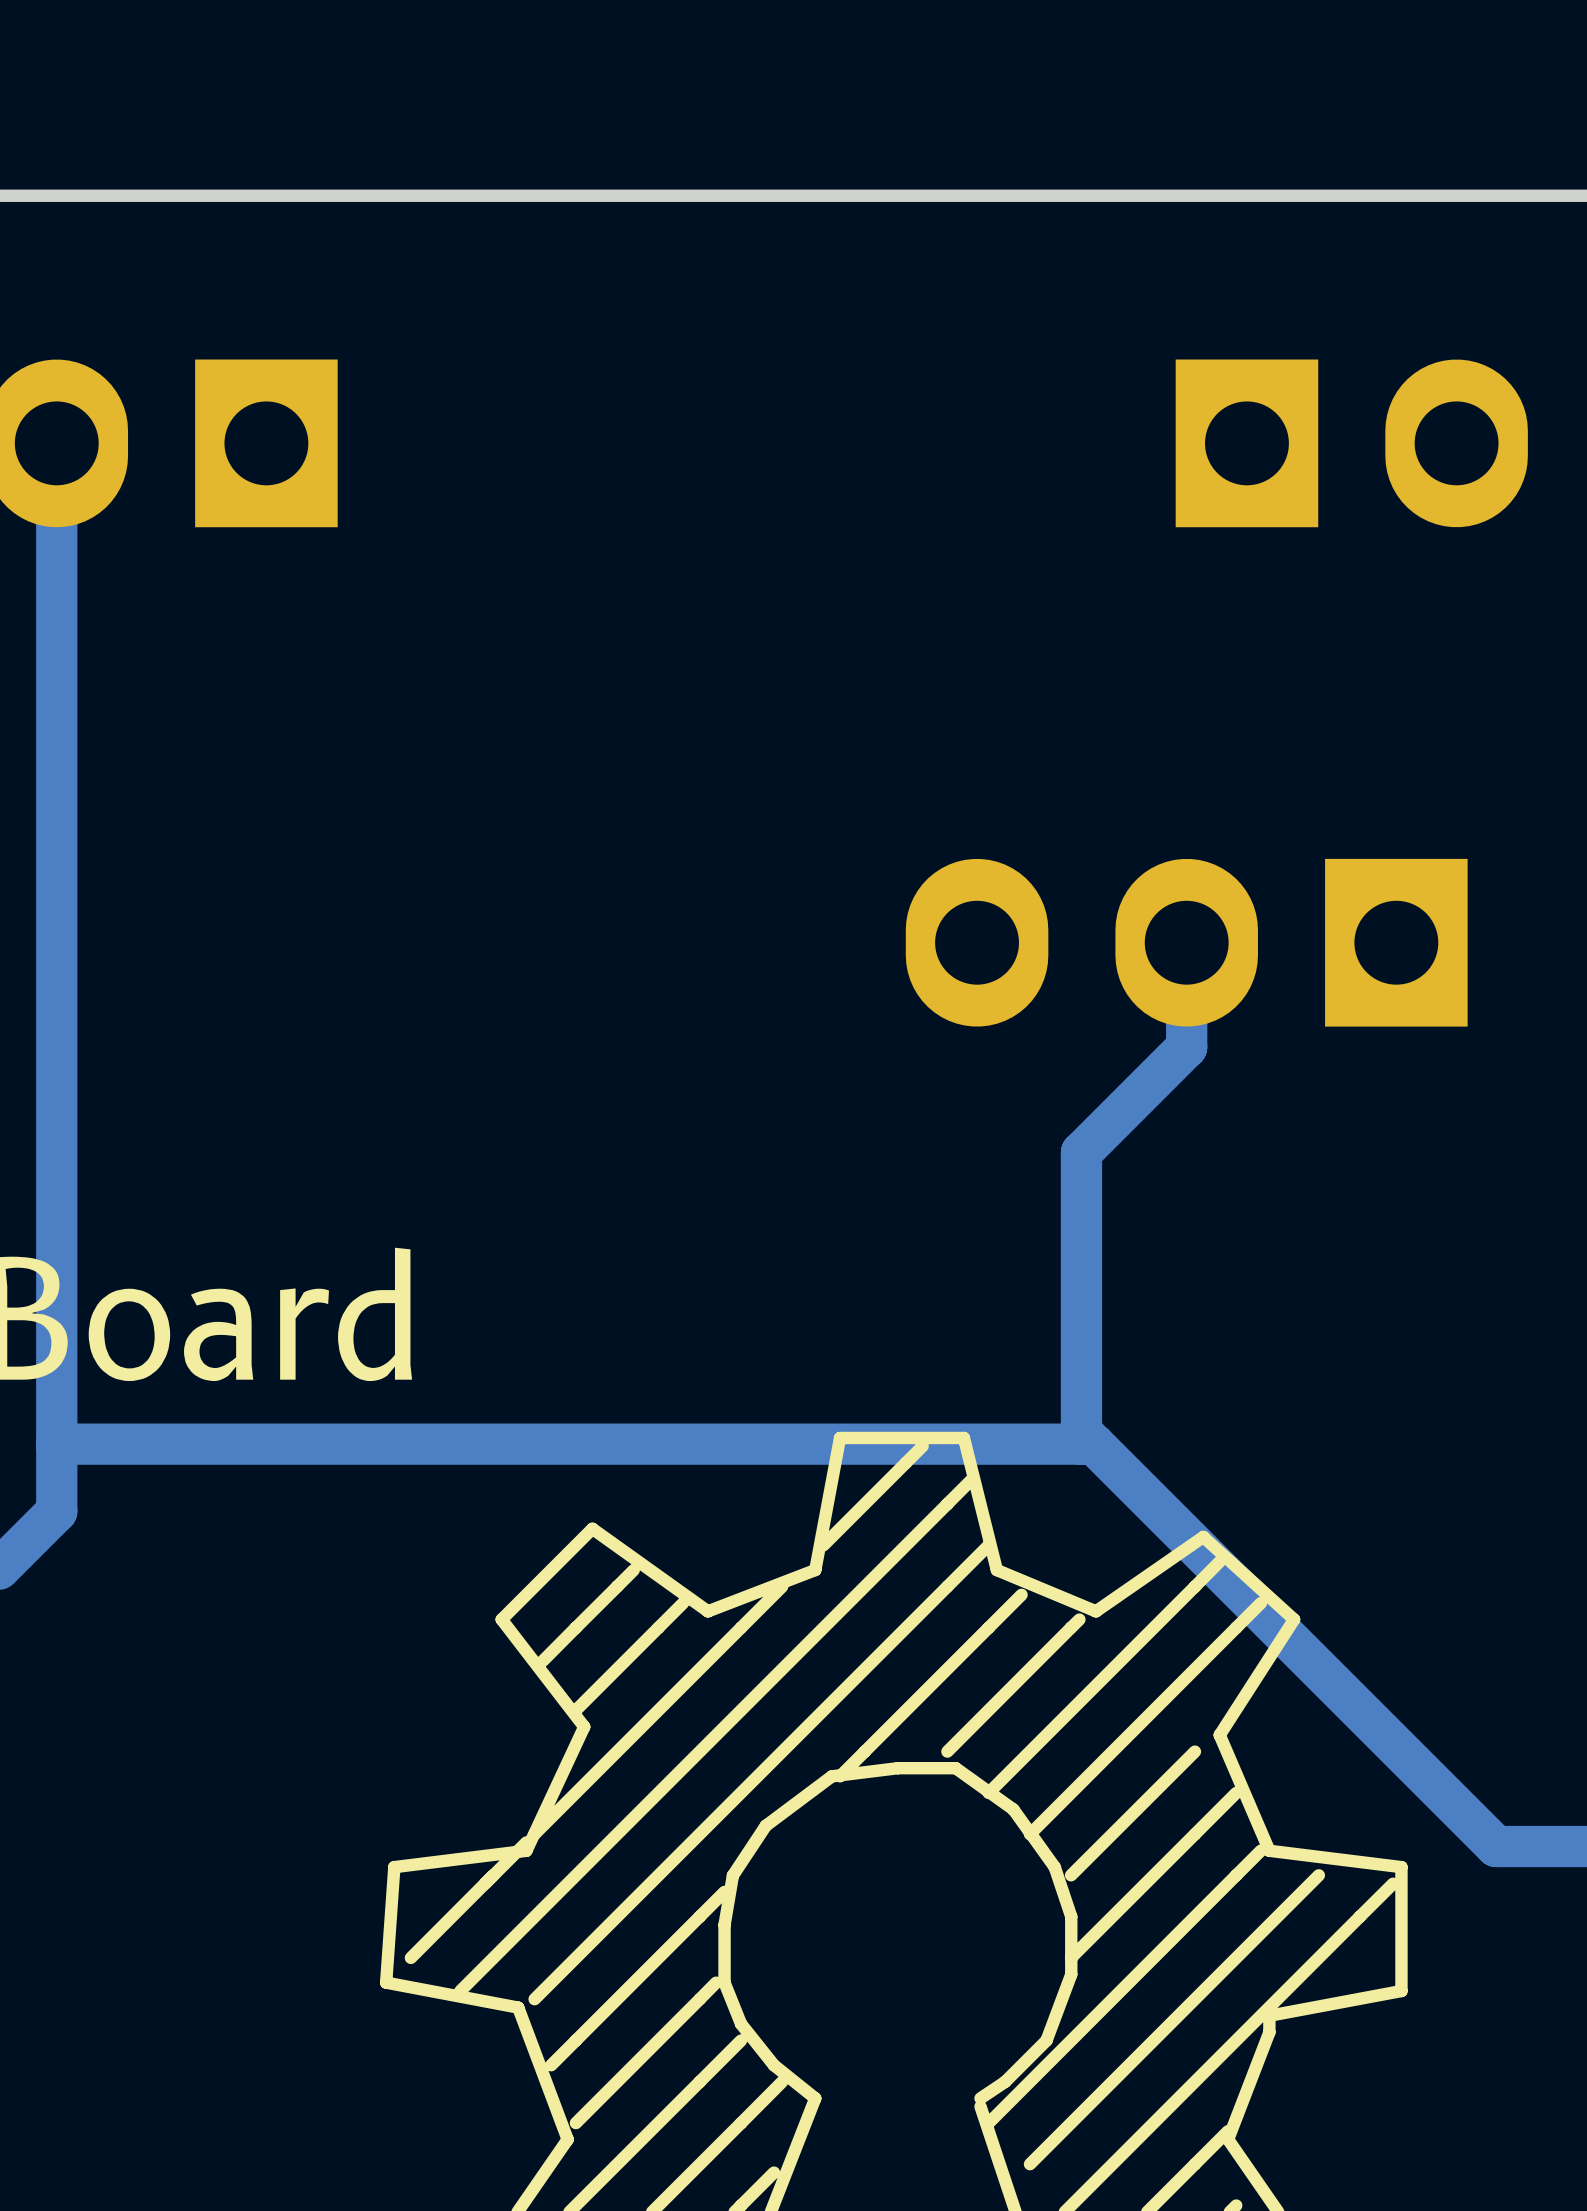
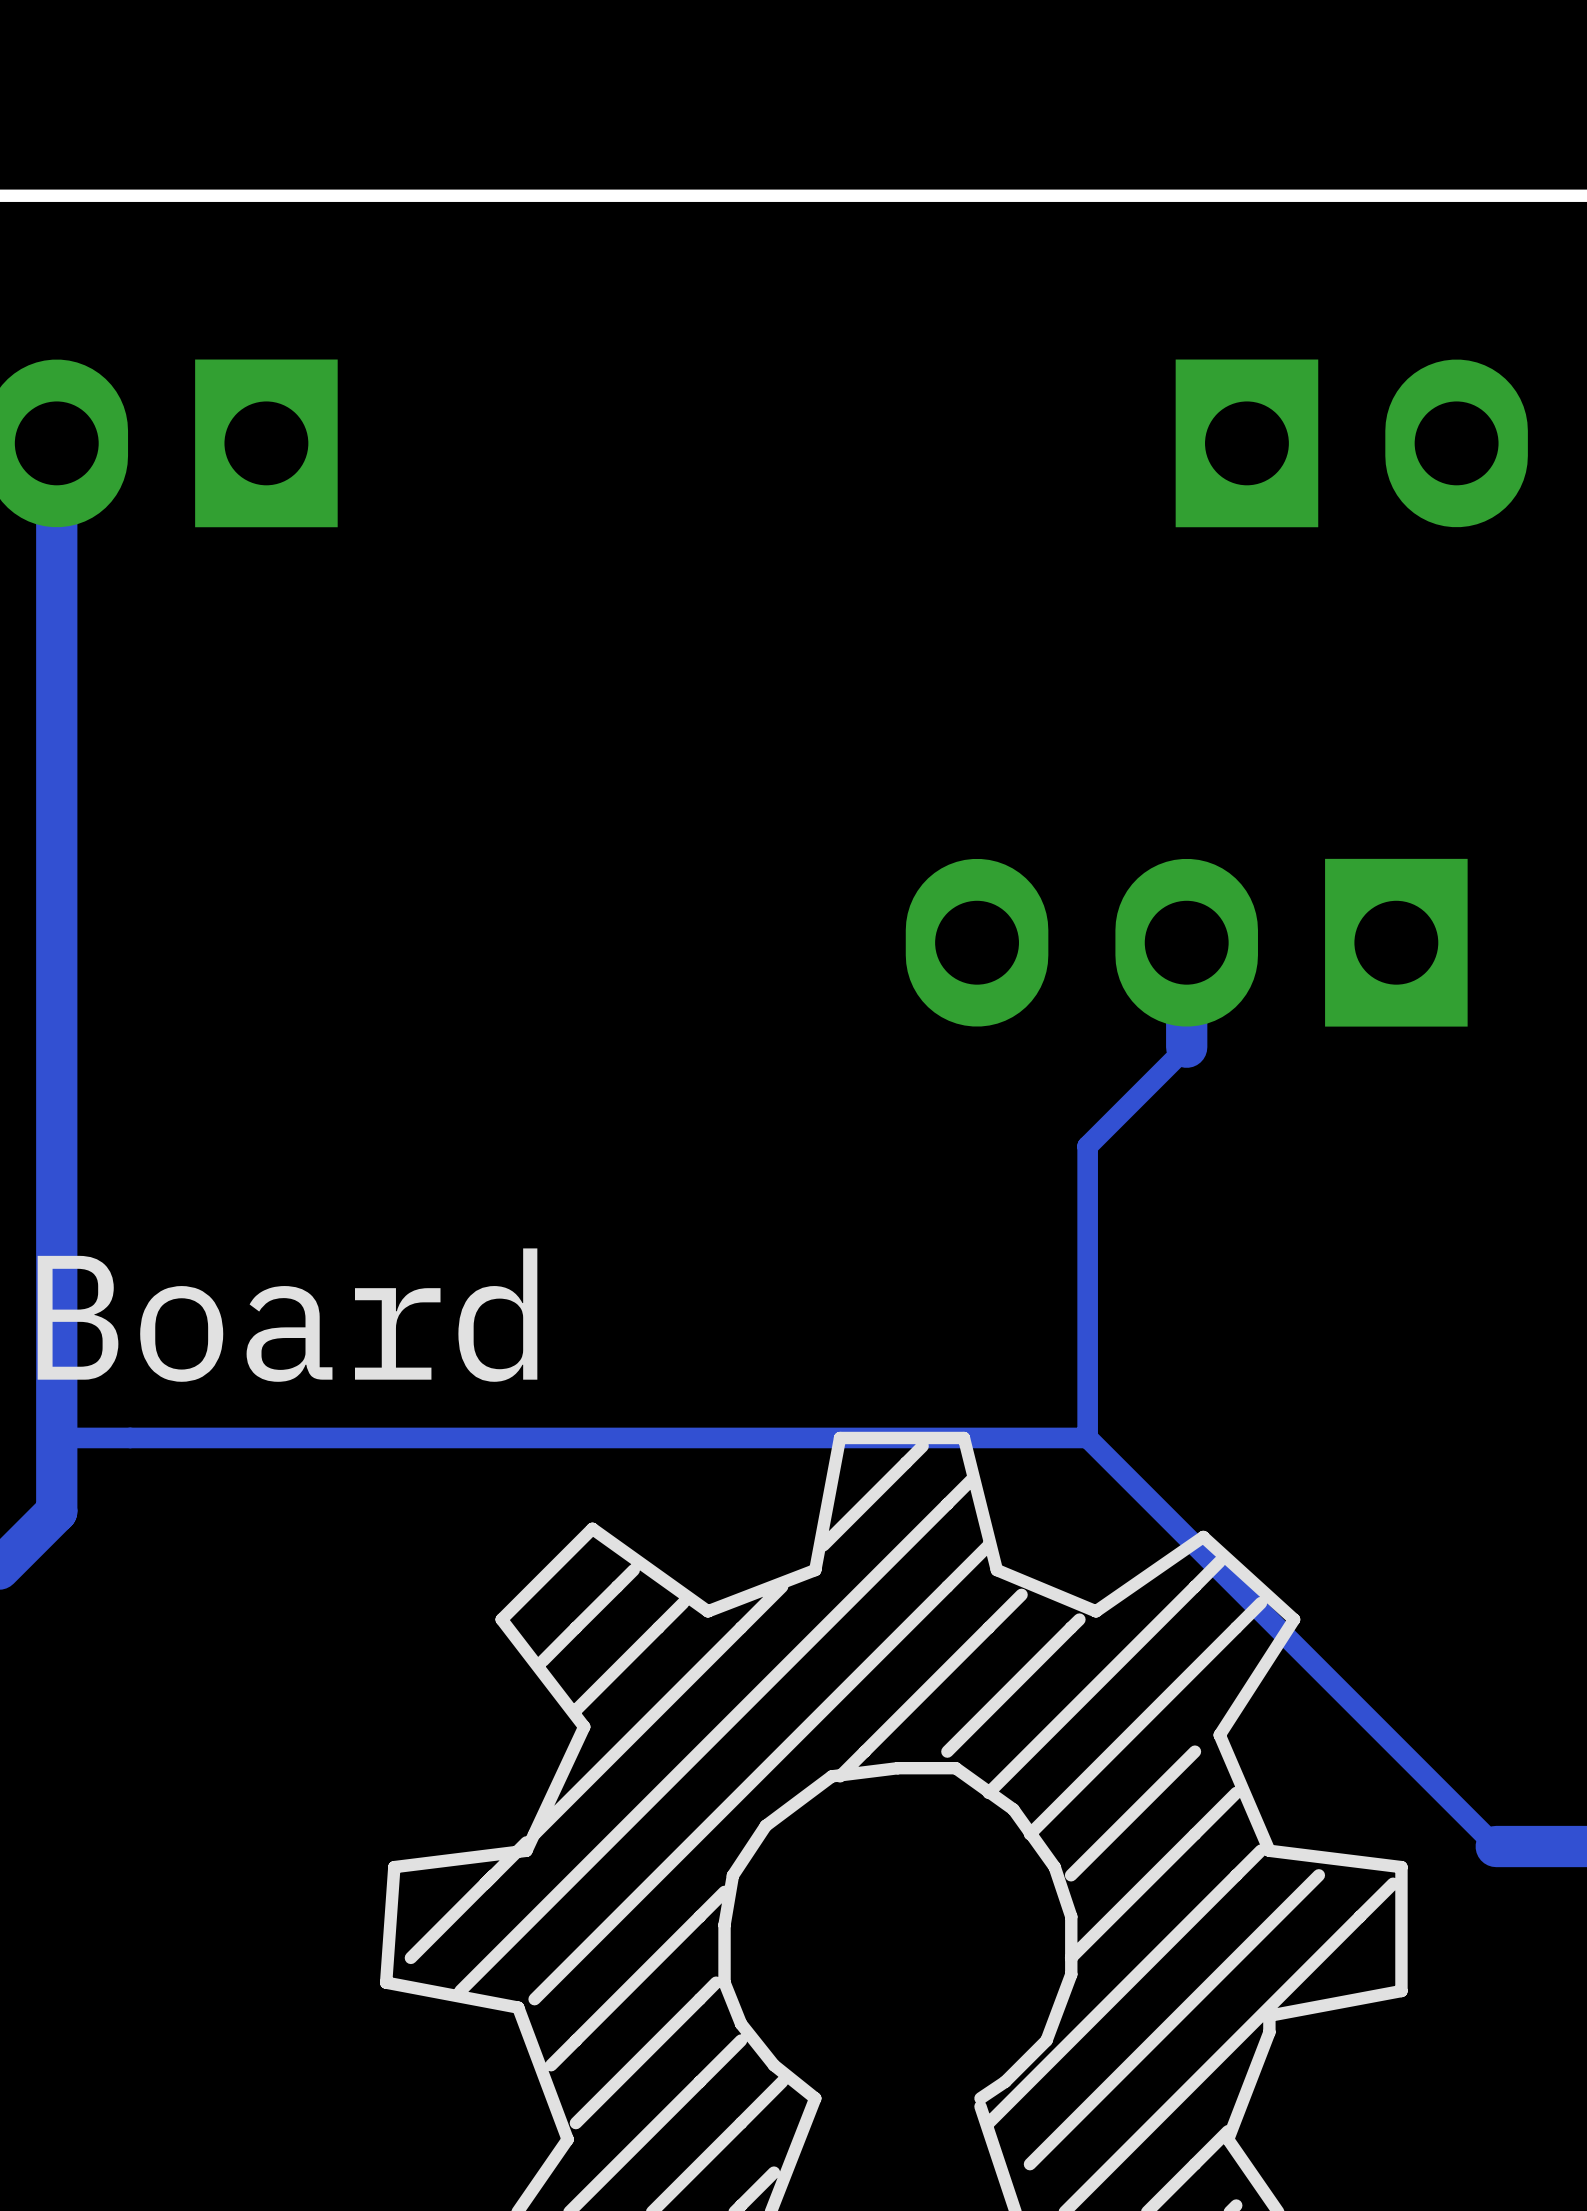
track: (1186, 1047) (1081, 1152) (1081, 1444) (1087, 1437) -> none
track: (56, 1444) (1093, 1444) (1496, 1846) -> none

